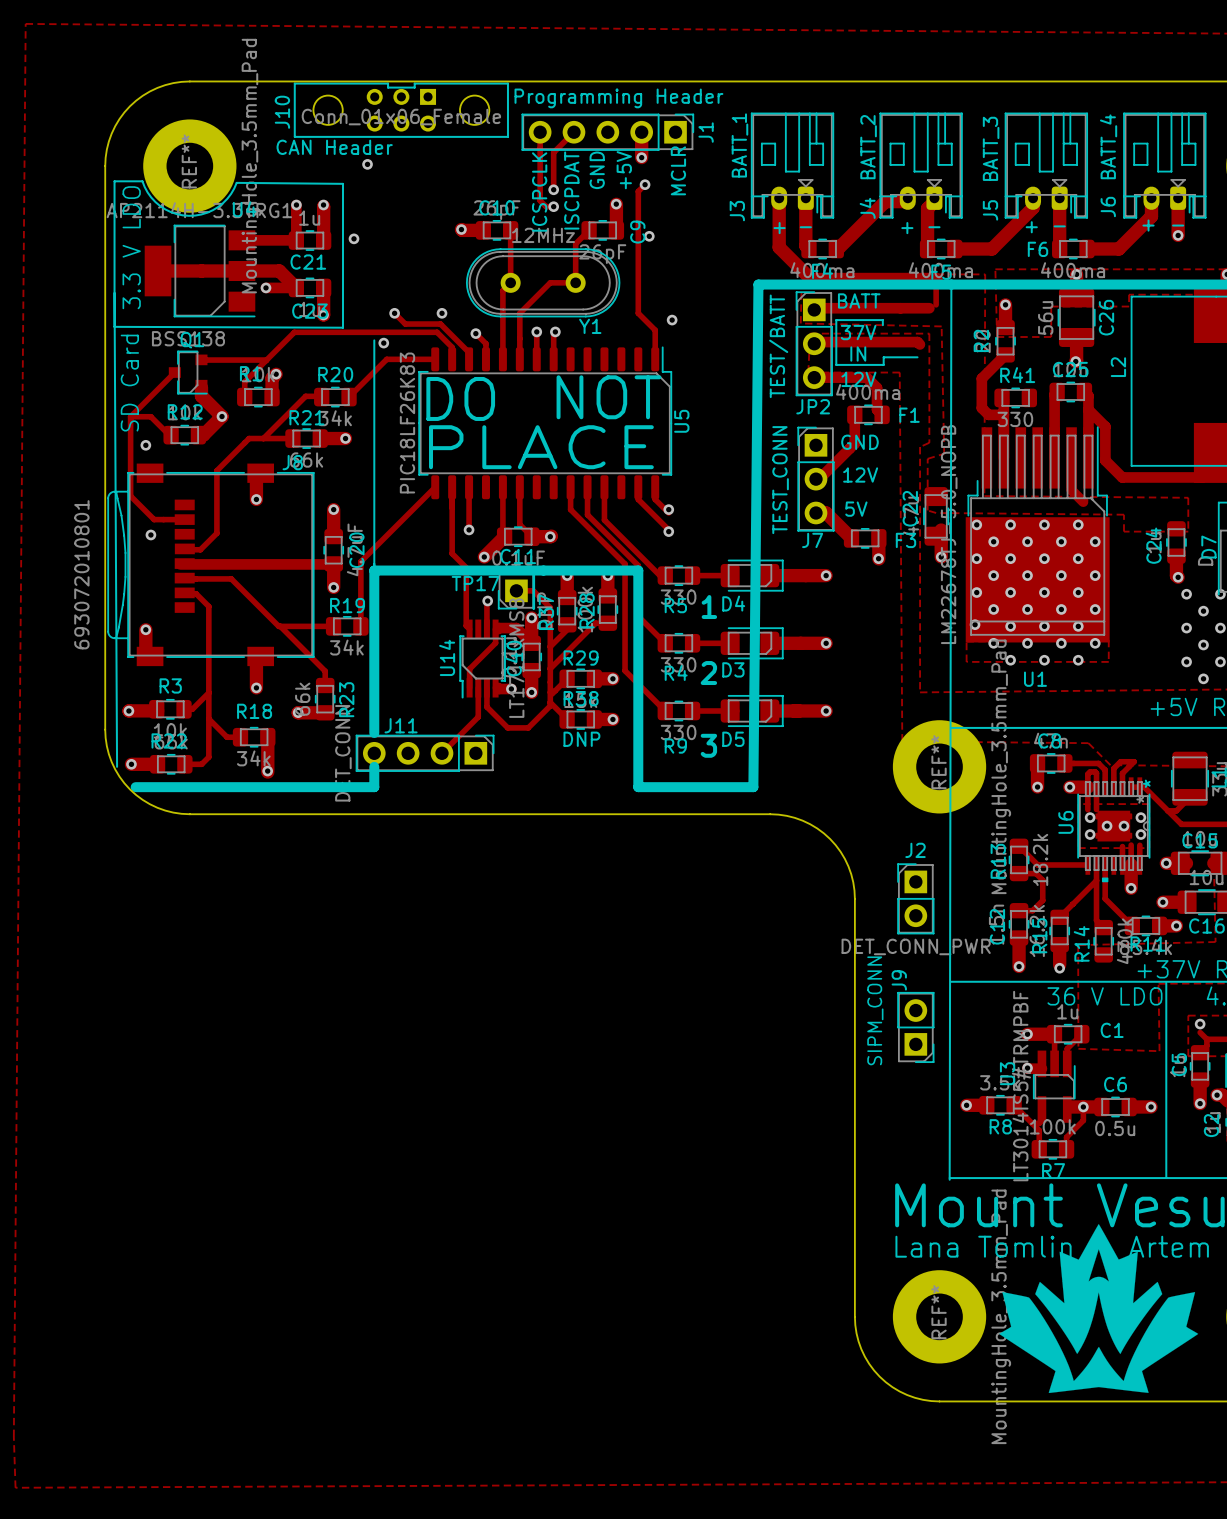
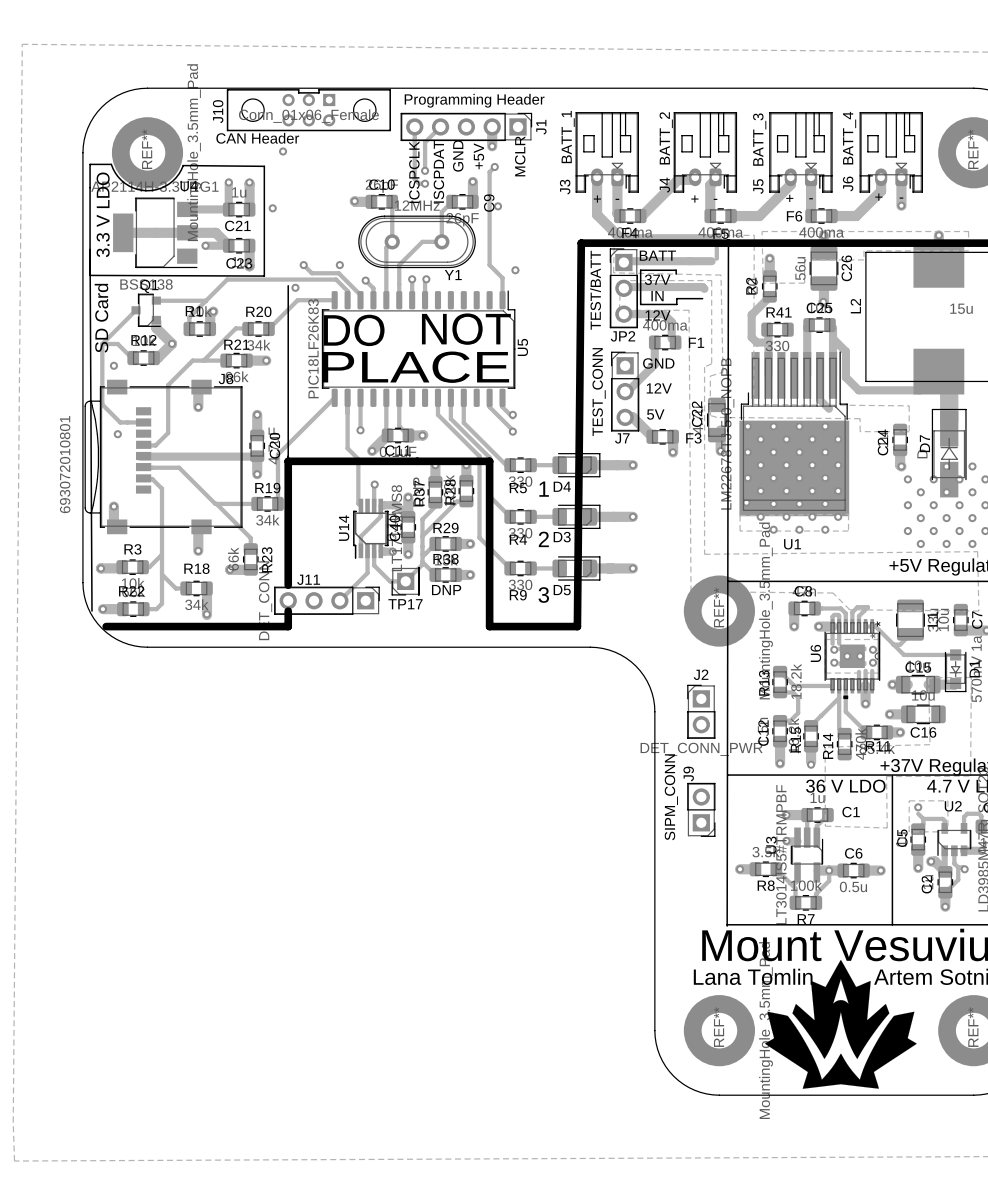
TP17 name position: TP17 (475, 583) -> TP17 (405, 604)
track: (516, 590) (533, 590) (550, 607) (550, 646) -> none
TP17 position: (516, 590) -> (405, 581)

